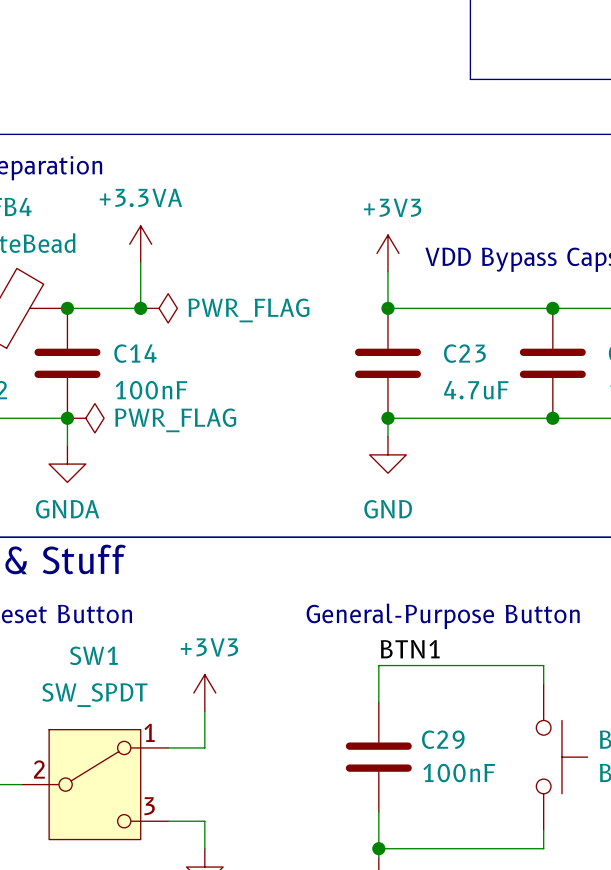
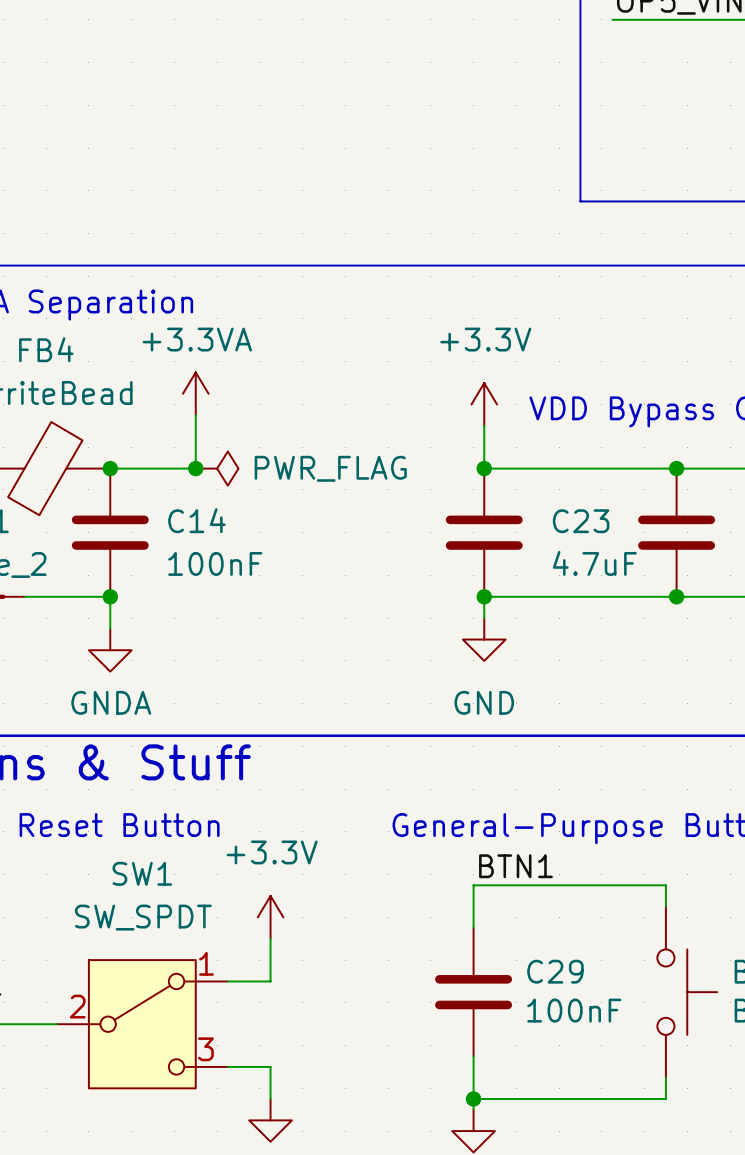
power symbol: +3V3 (387, 253) -> +3.3V (484, 404)
power symbol: PWR_FLAG (85, 418) -> none
power symbol: +3V3 (204, 693) -> +3.3V (270, 917)

